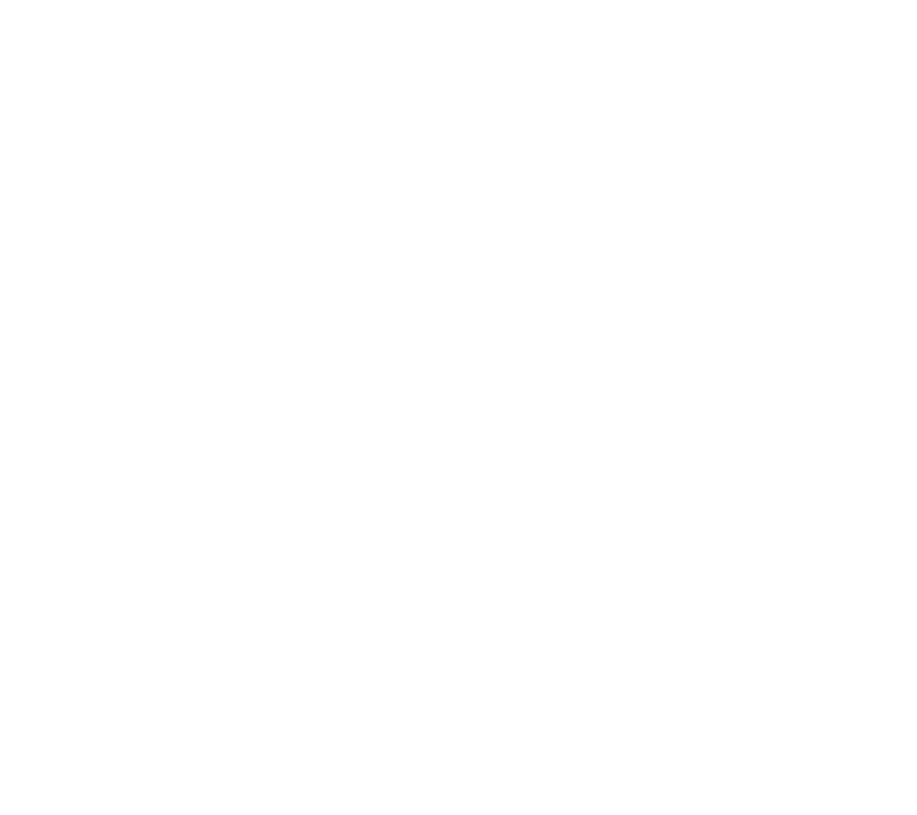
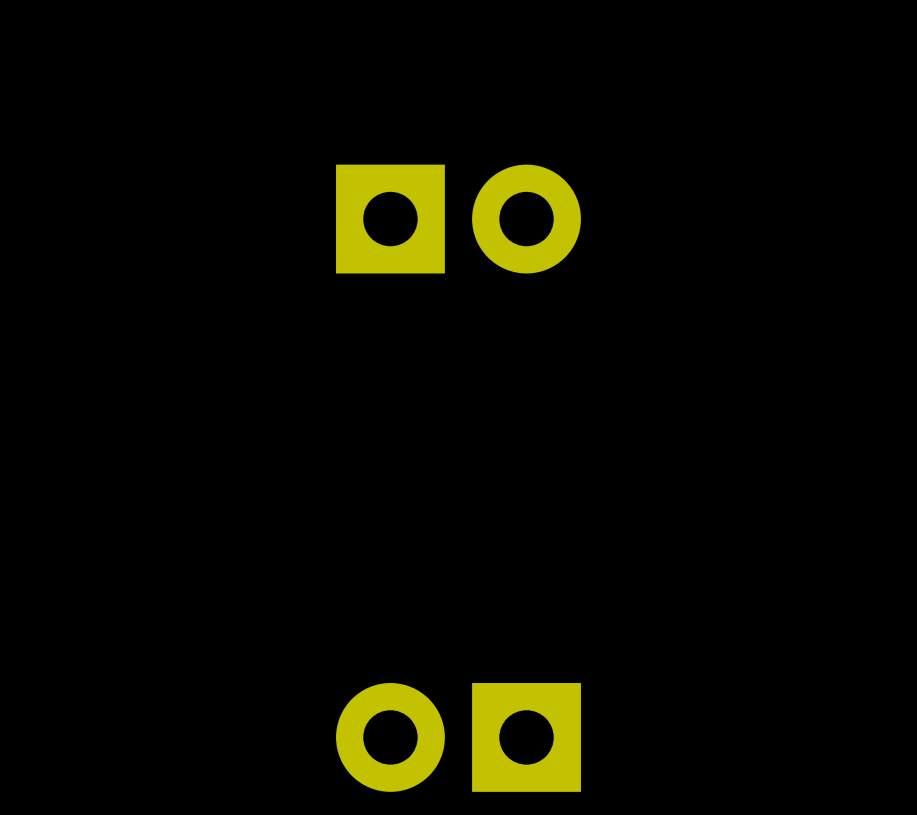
part: none -> (458, 219)
part: none -> (458, 737)

